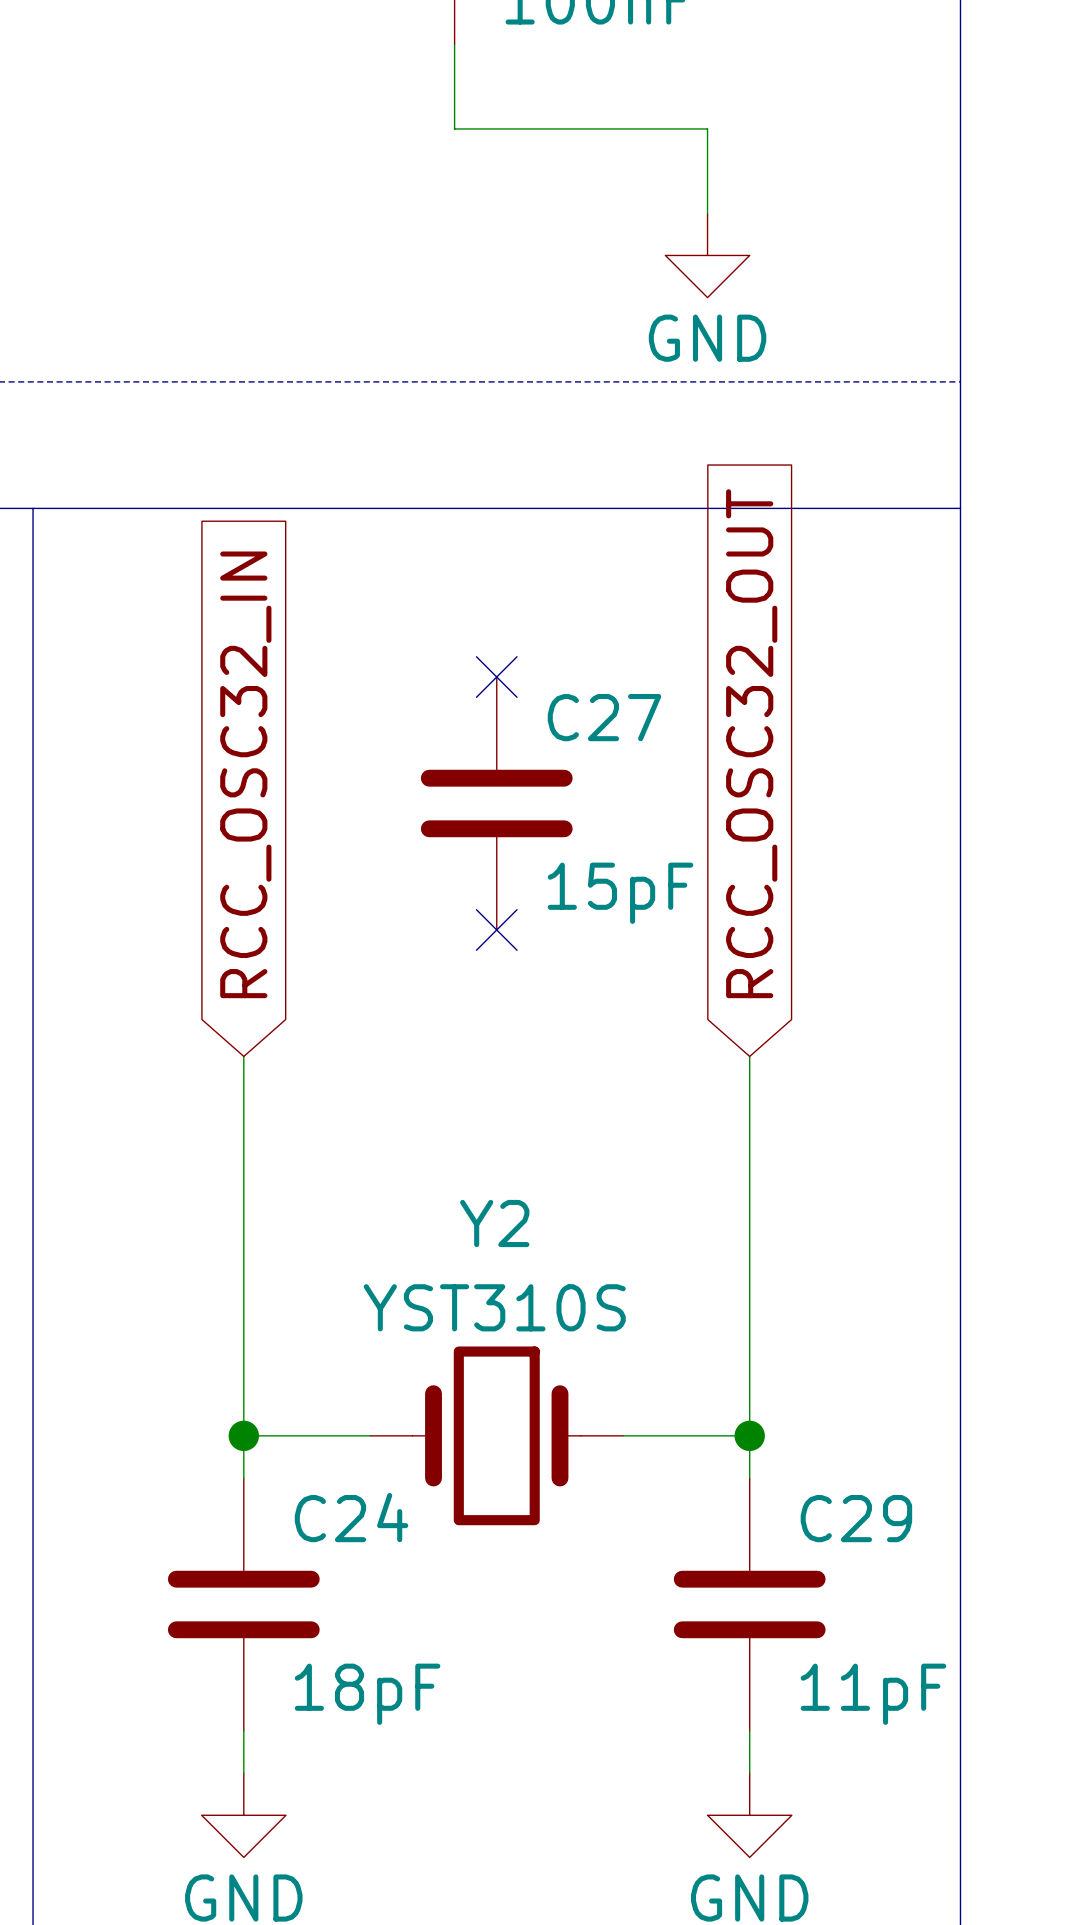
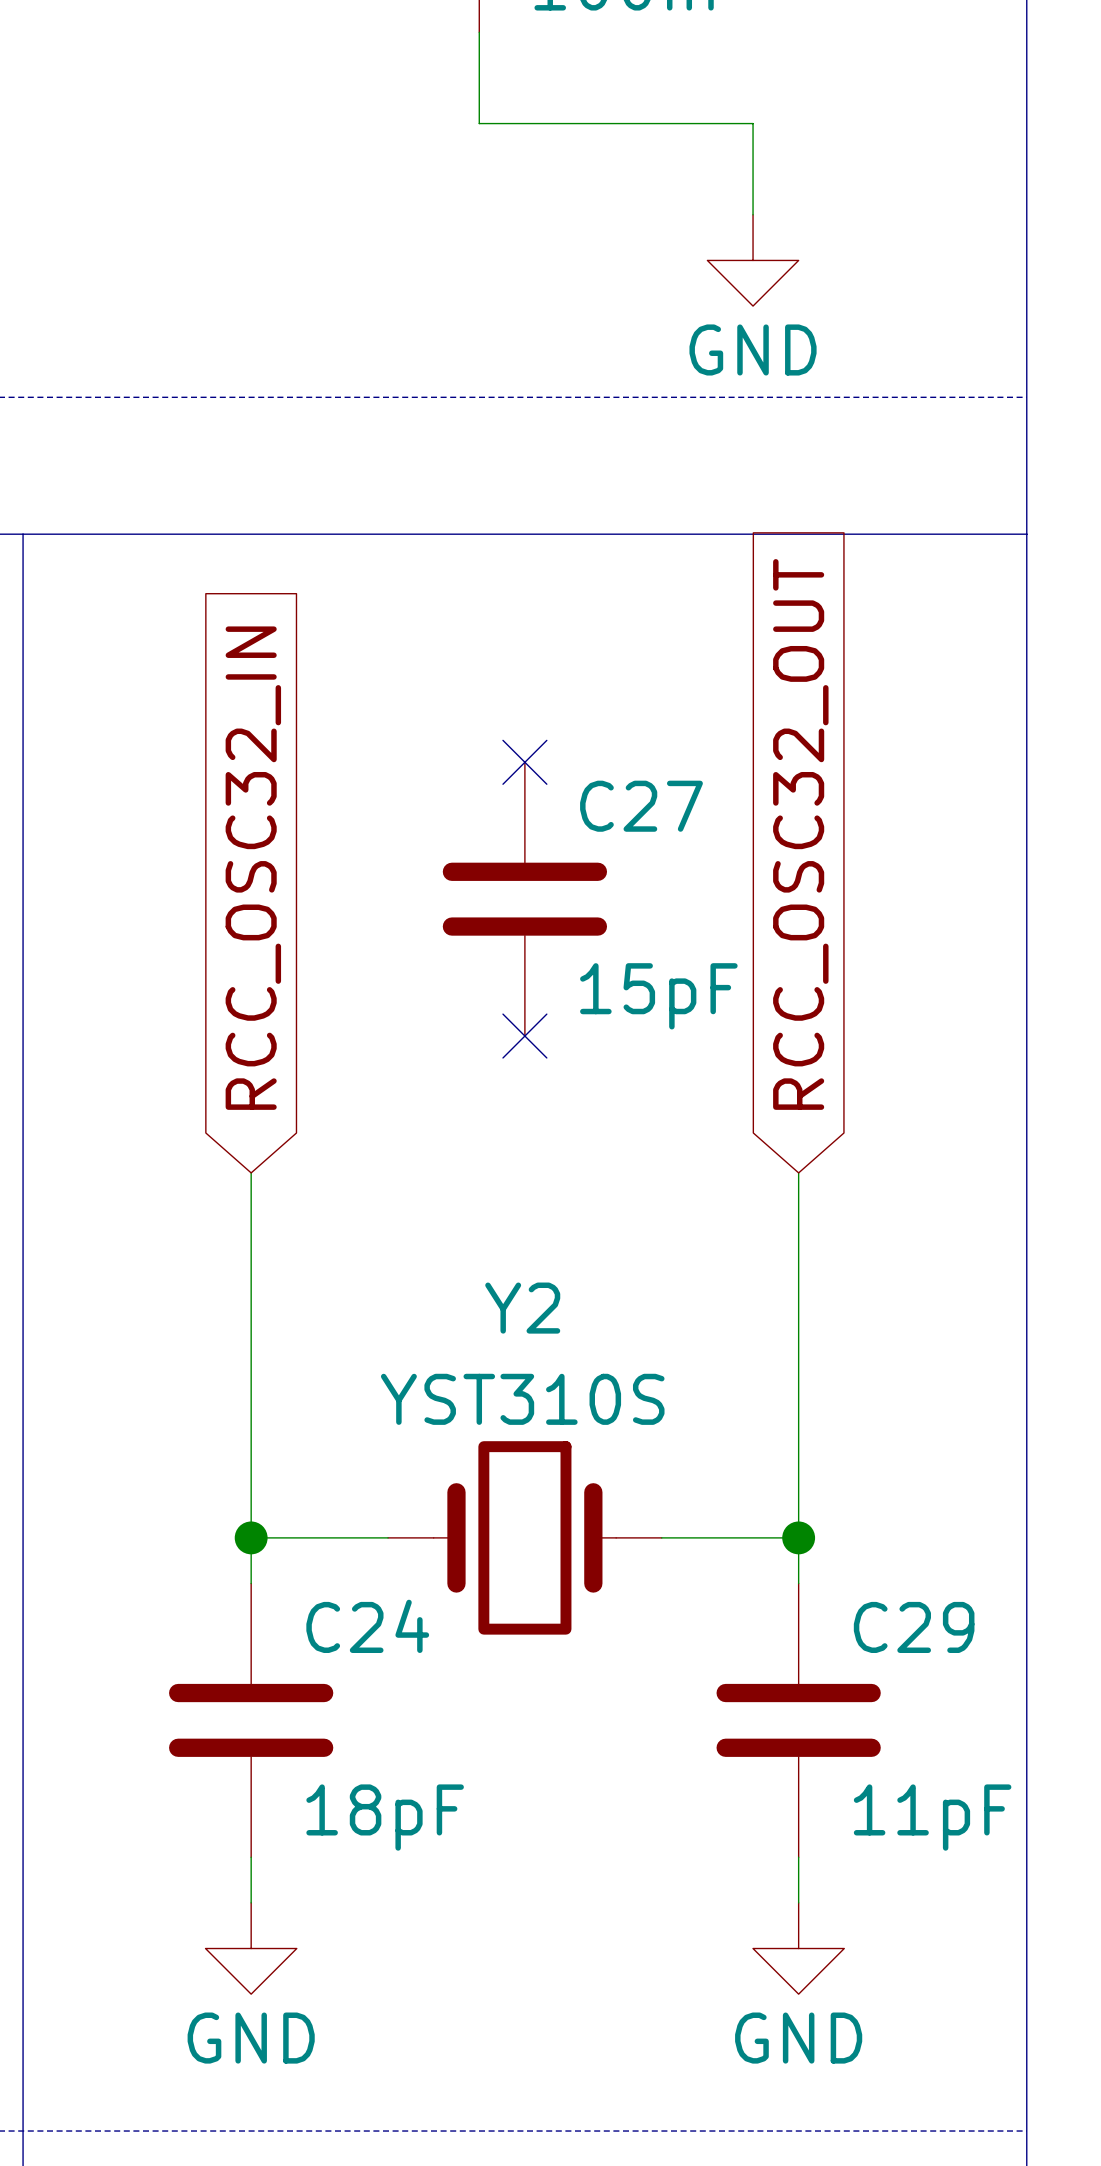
no-connect mark position: (496, 677) -> (524, 762)
global label position: RCC_OSC32_OUT (751, 743) -> RCC_OSC32_OUT (800, 834)
global label position: RCC_OSC32_IN (245, 774) -> RCC_OSC32_IN (253, 868)
C27 position: (496, 803) -> (524, 899)
no-connect mark position: (496, 929) -> (524, 1036)
wire: (243, 1056) (243, 1098) -> none
wire: (749, 1056) (749, 1098) -> none

